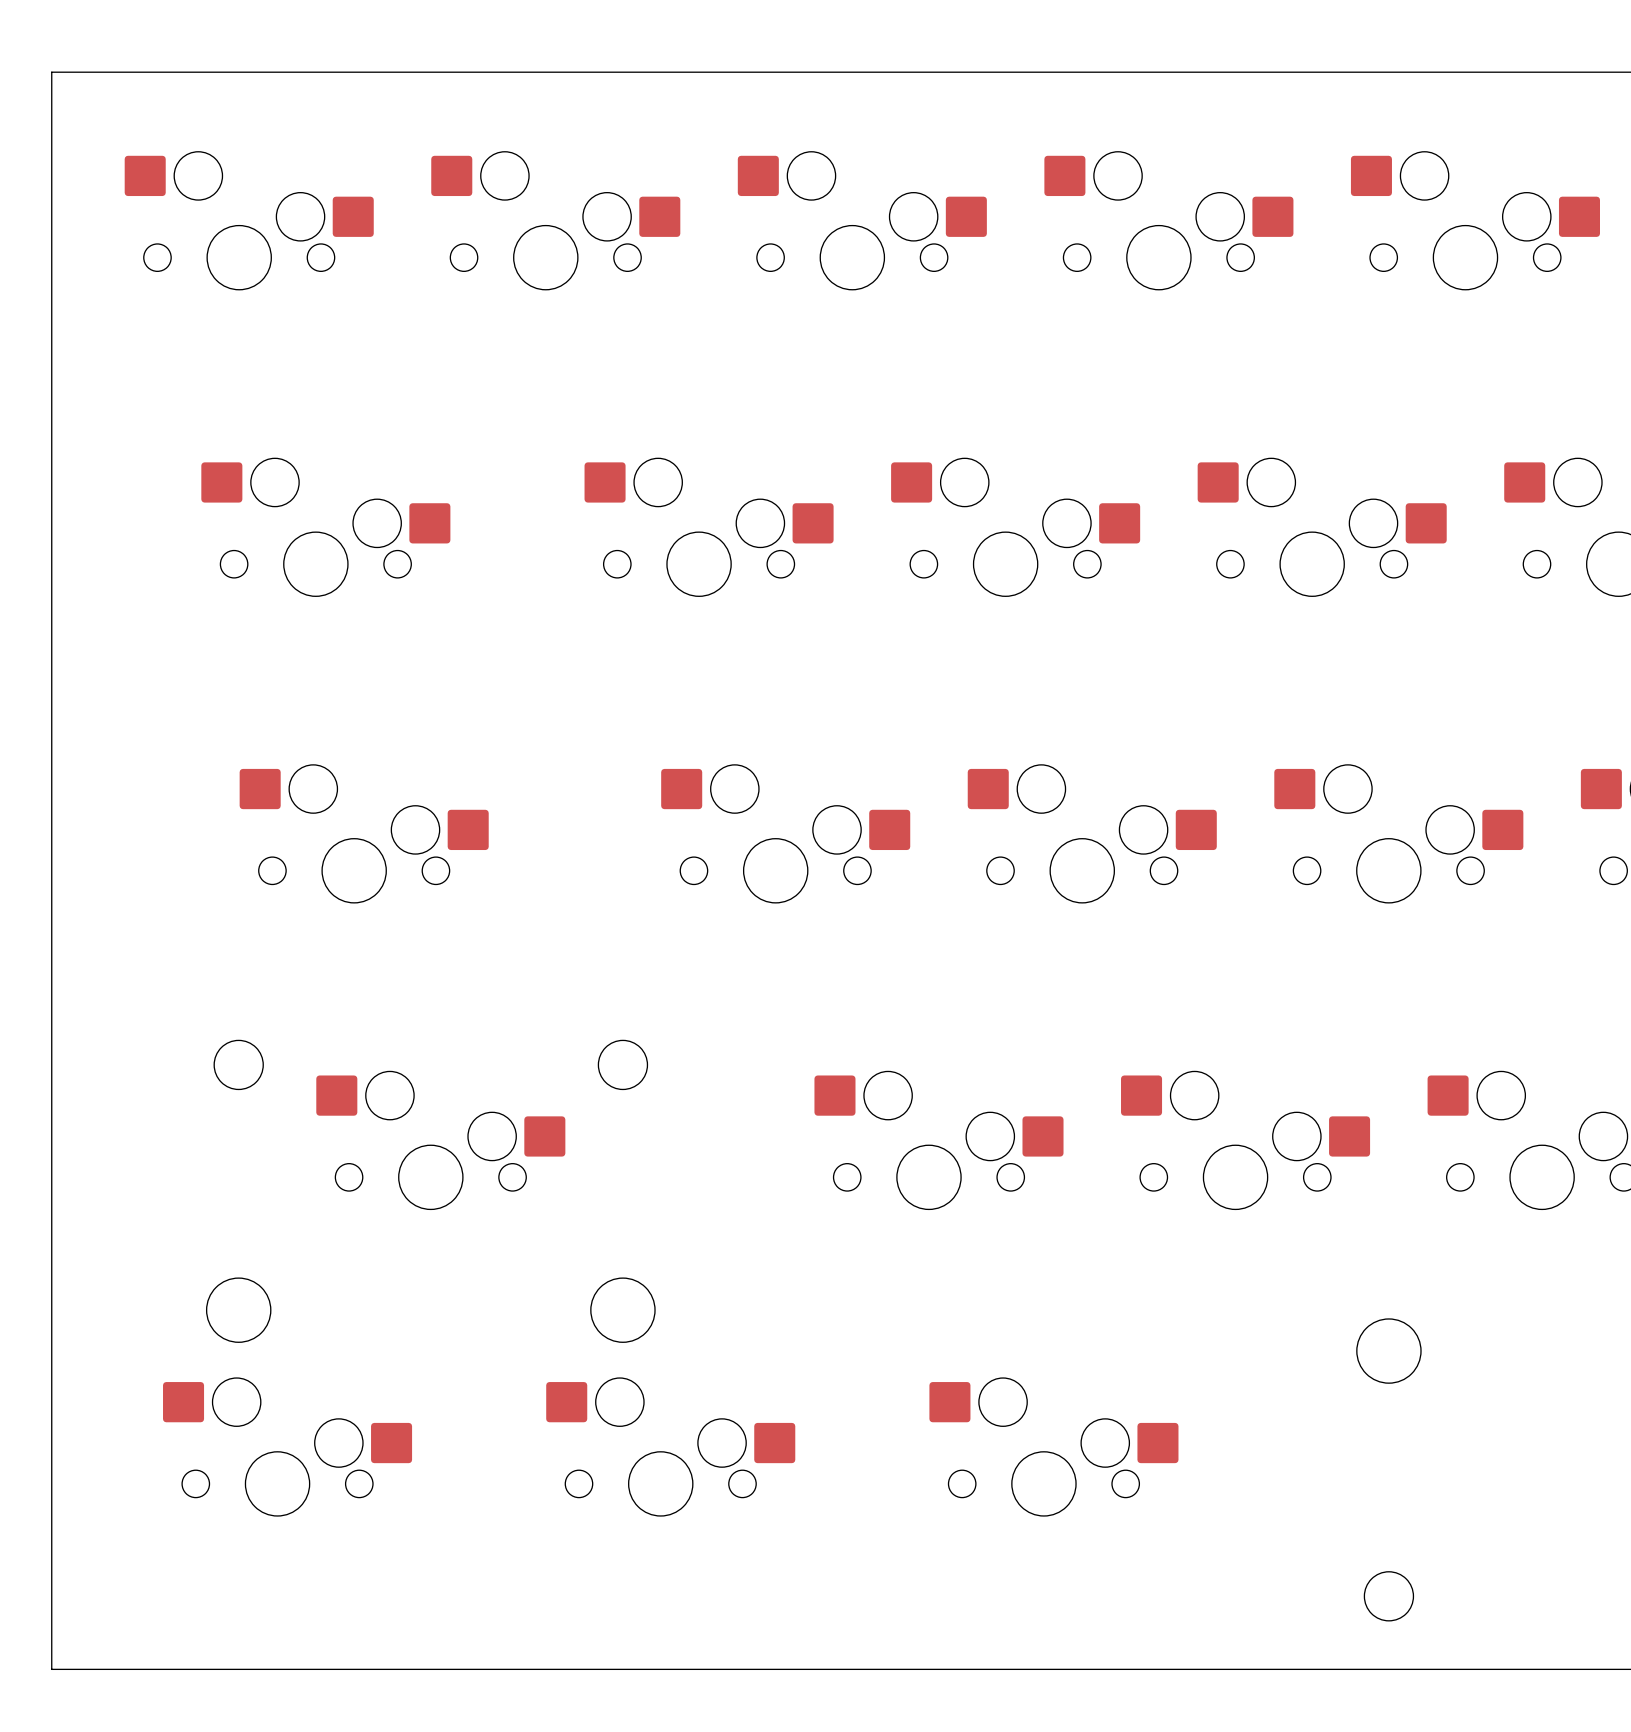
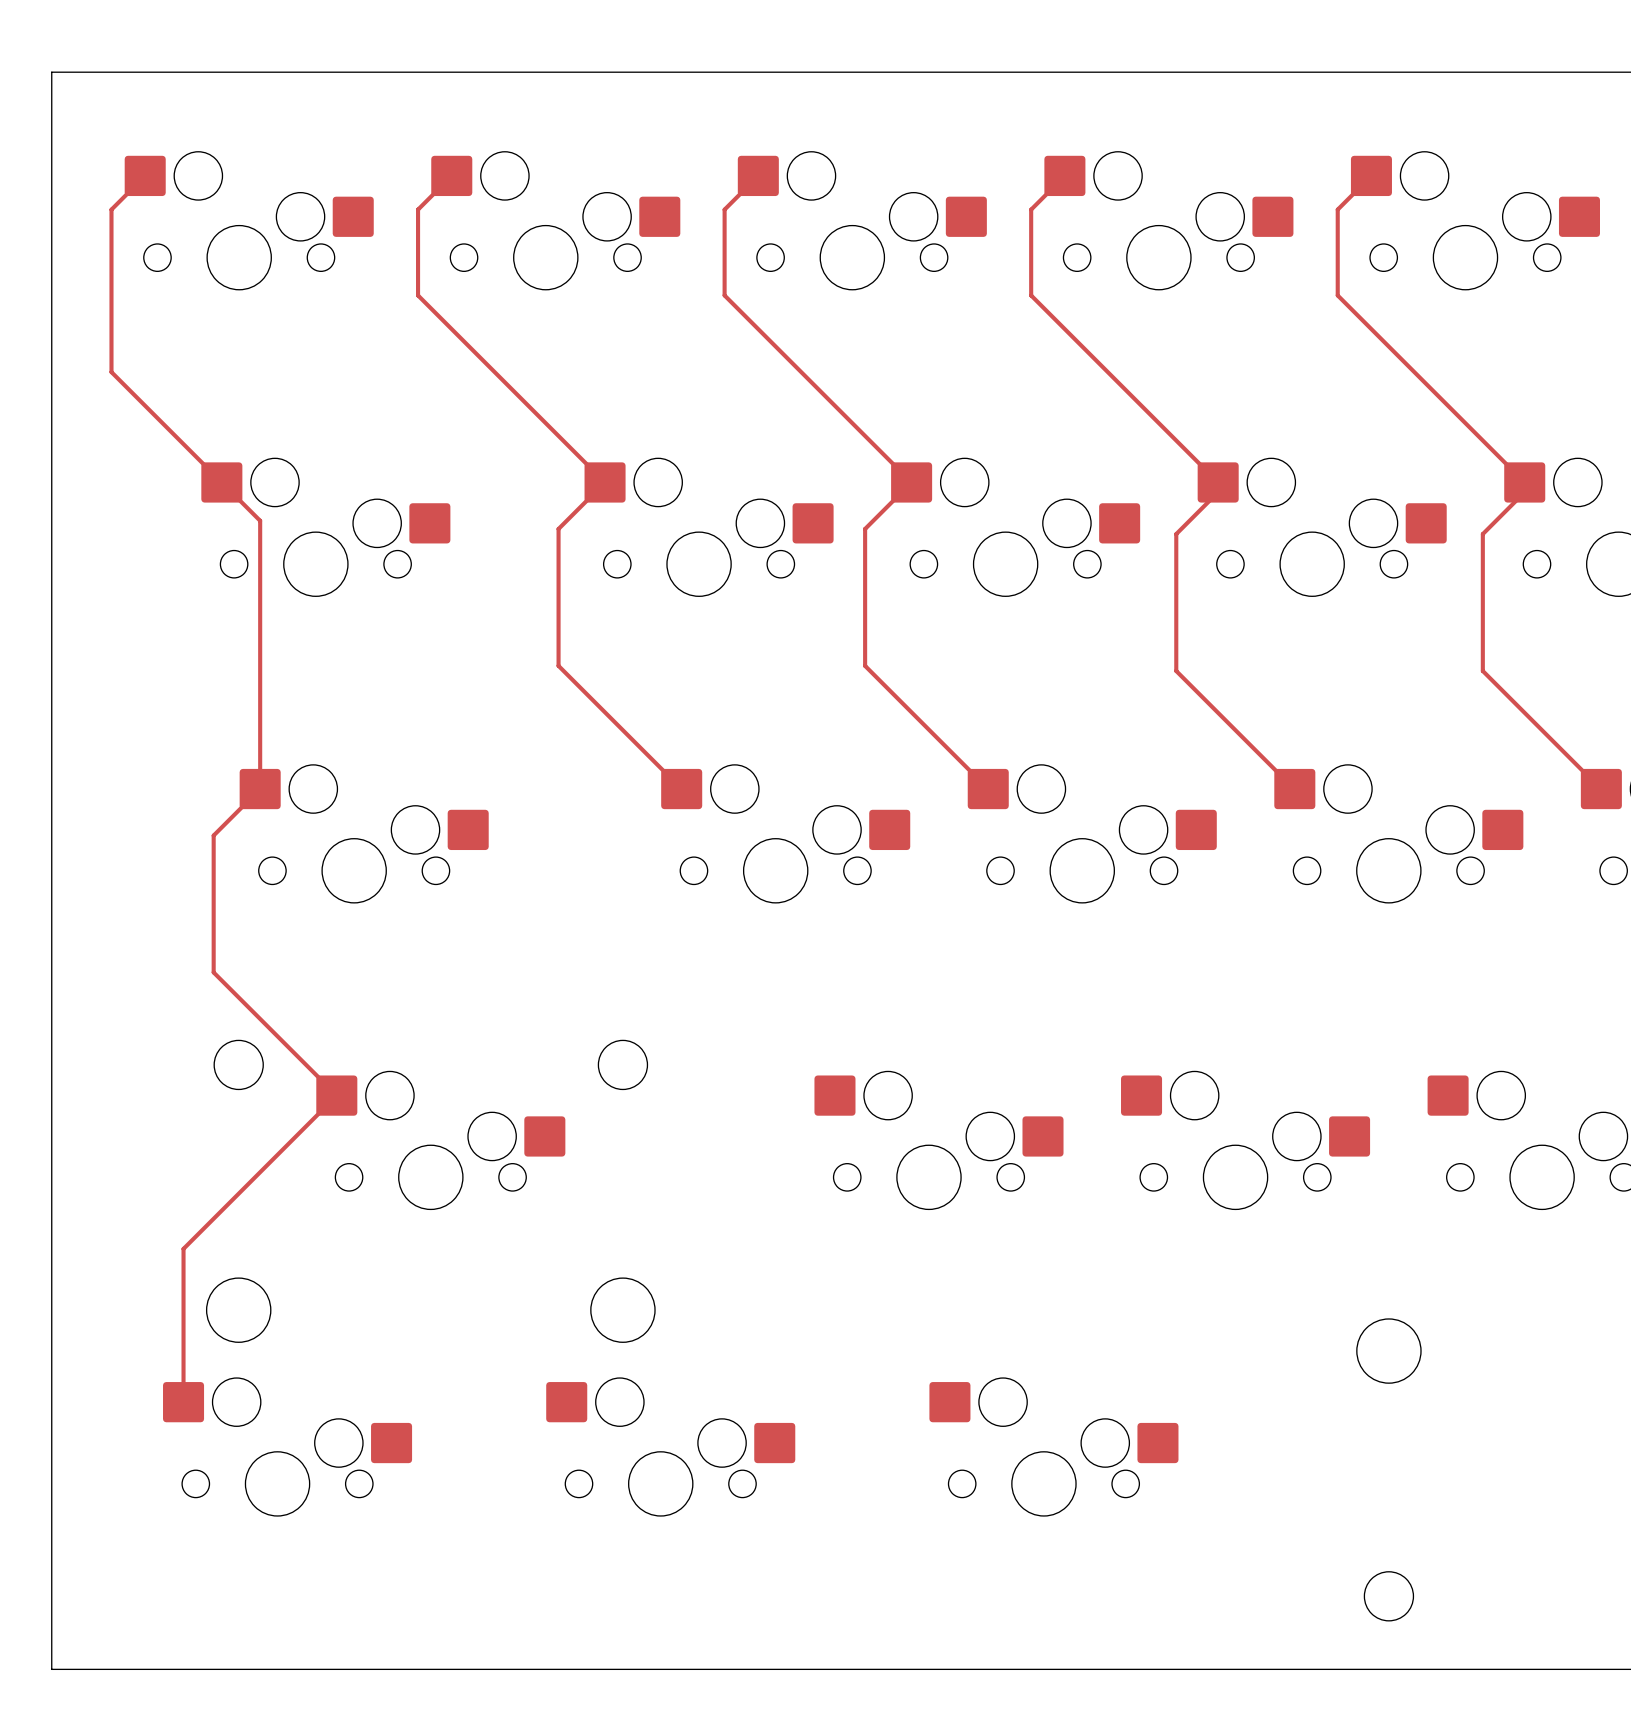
track: none -> (145, 175) (111, 209) (111, 372) (260, 520) (260, 789) (213, 835) (213, 972) (336, 1095) (183, 1248) (183, 1402)
track: none -> (451, 175) (418, 209) (418, 295) (605, 482) (558, 528) (558, 665) (681, 789)
track: none -> (758, 175) (724, 209) (724, 295) (911, 482) (865, 528) (865, 665) (988, 789)
track: none -> (1064, 175) (1031, 209) (1031, 295) (1218, 482)
track: none -> (1371, 175) (1337, 209) (1337, 295) (1524, 482)
track: none -> (1222, 487) (1176, 534) (1176, 671) (1299, 794)
track: none -> (1529, 487) (1482, 534) (1482, 671) (1605, 794)

